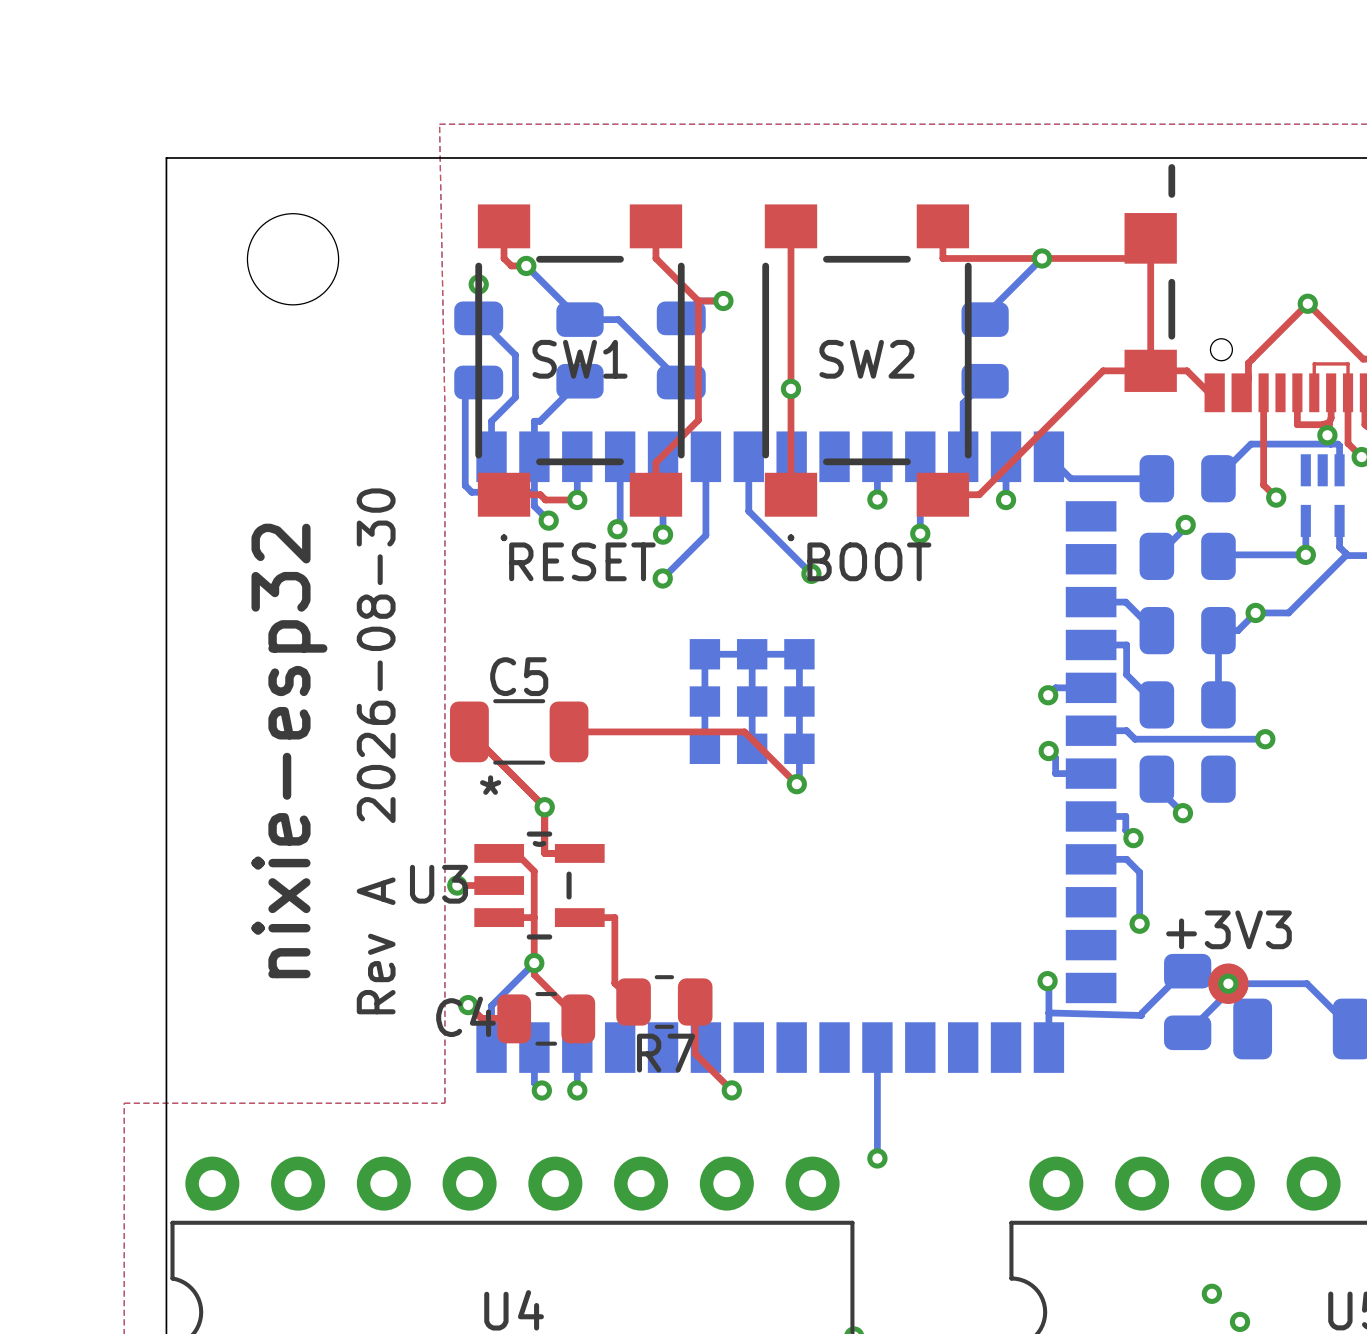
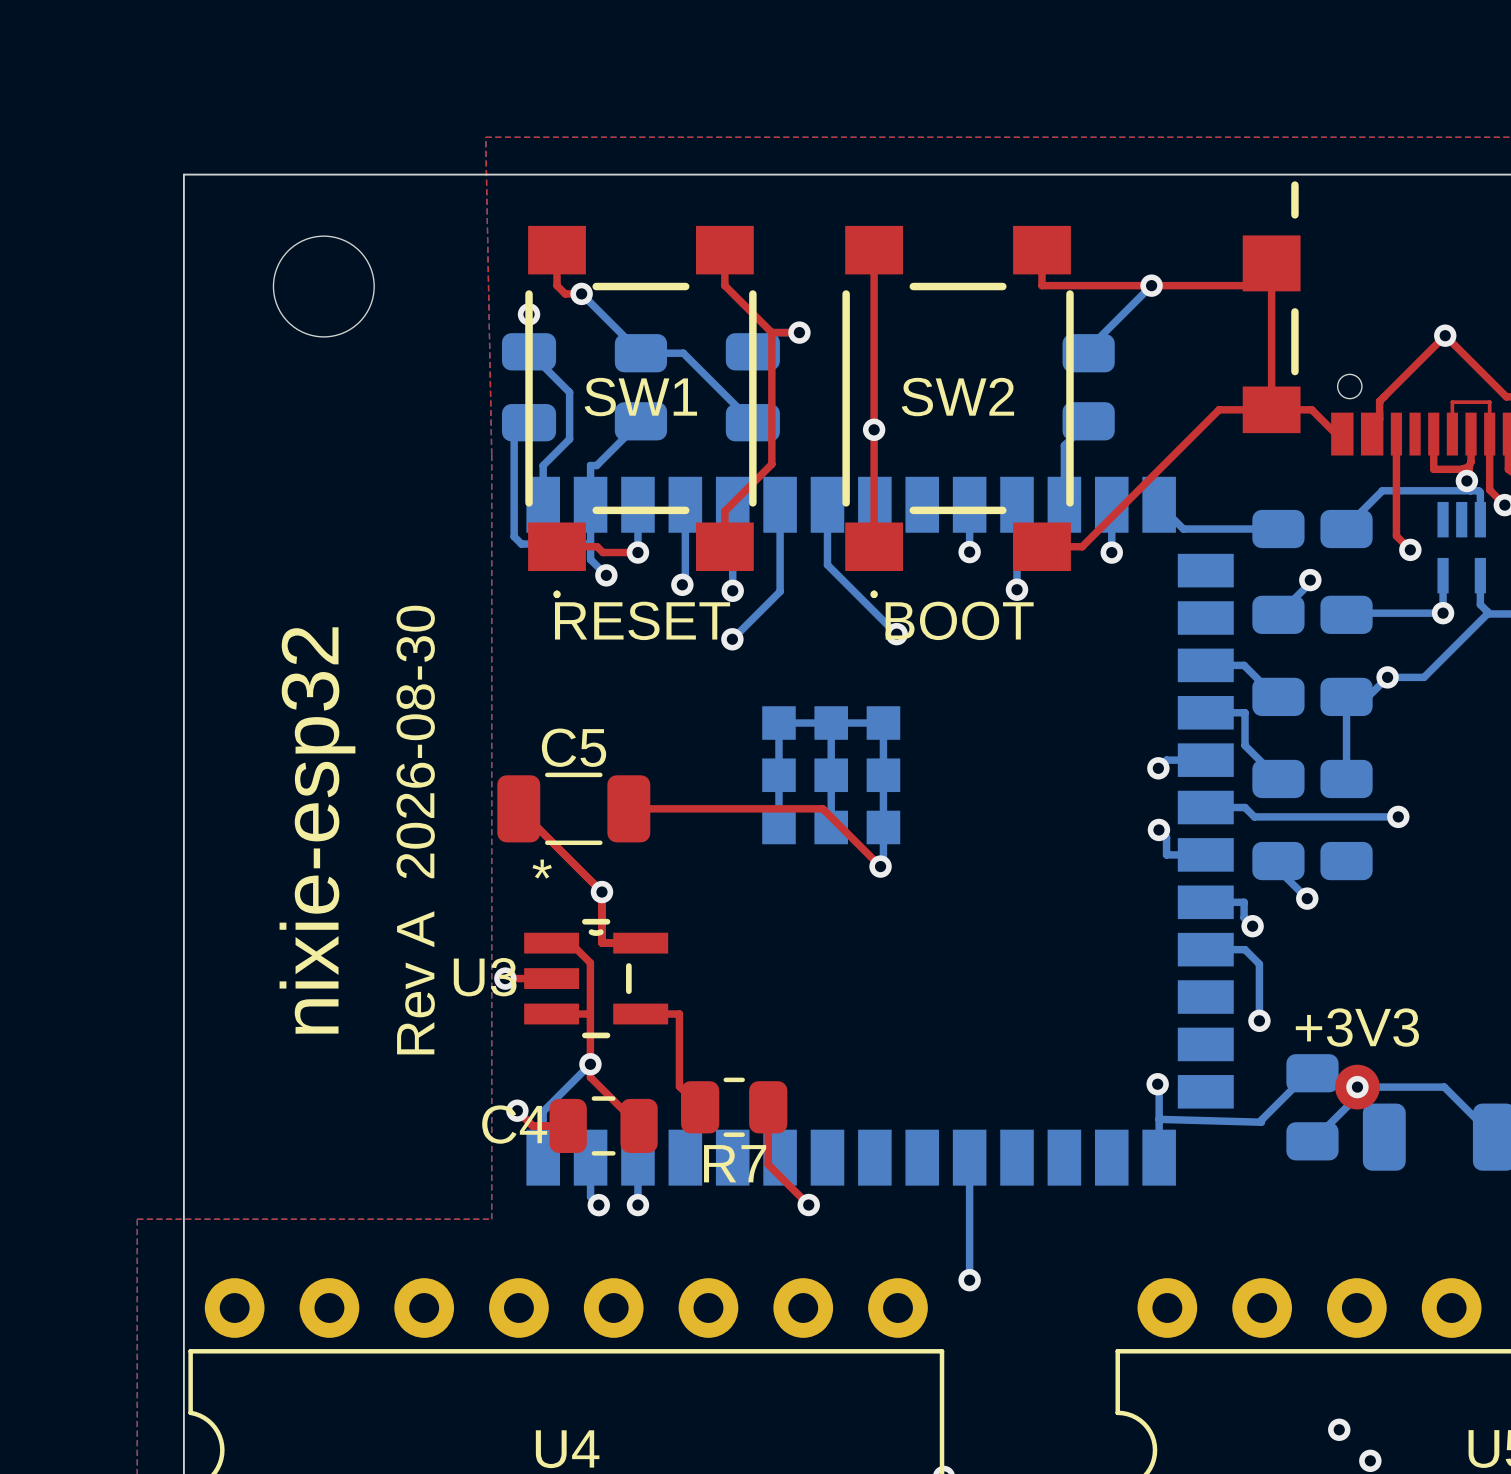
part footprint: [1139, 455, 1236, 503] -> [1252, 509, 1373, 549]
part footprint: [1139, 532, 1236, 580] -> [1252, 595, 1373, 634]
part footprint: [1139, 607, 1236, 655] -> [1252, 677, 1373, 717]
part footprint: [1139, 681, 1236, 729] -> [1252, 759, 1373, 799]
part footprint: [1139, 755, 1236, 803] -> [1252, 841, 1373, 881]

